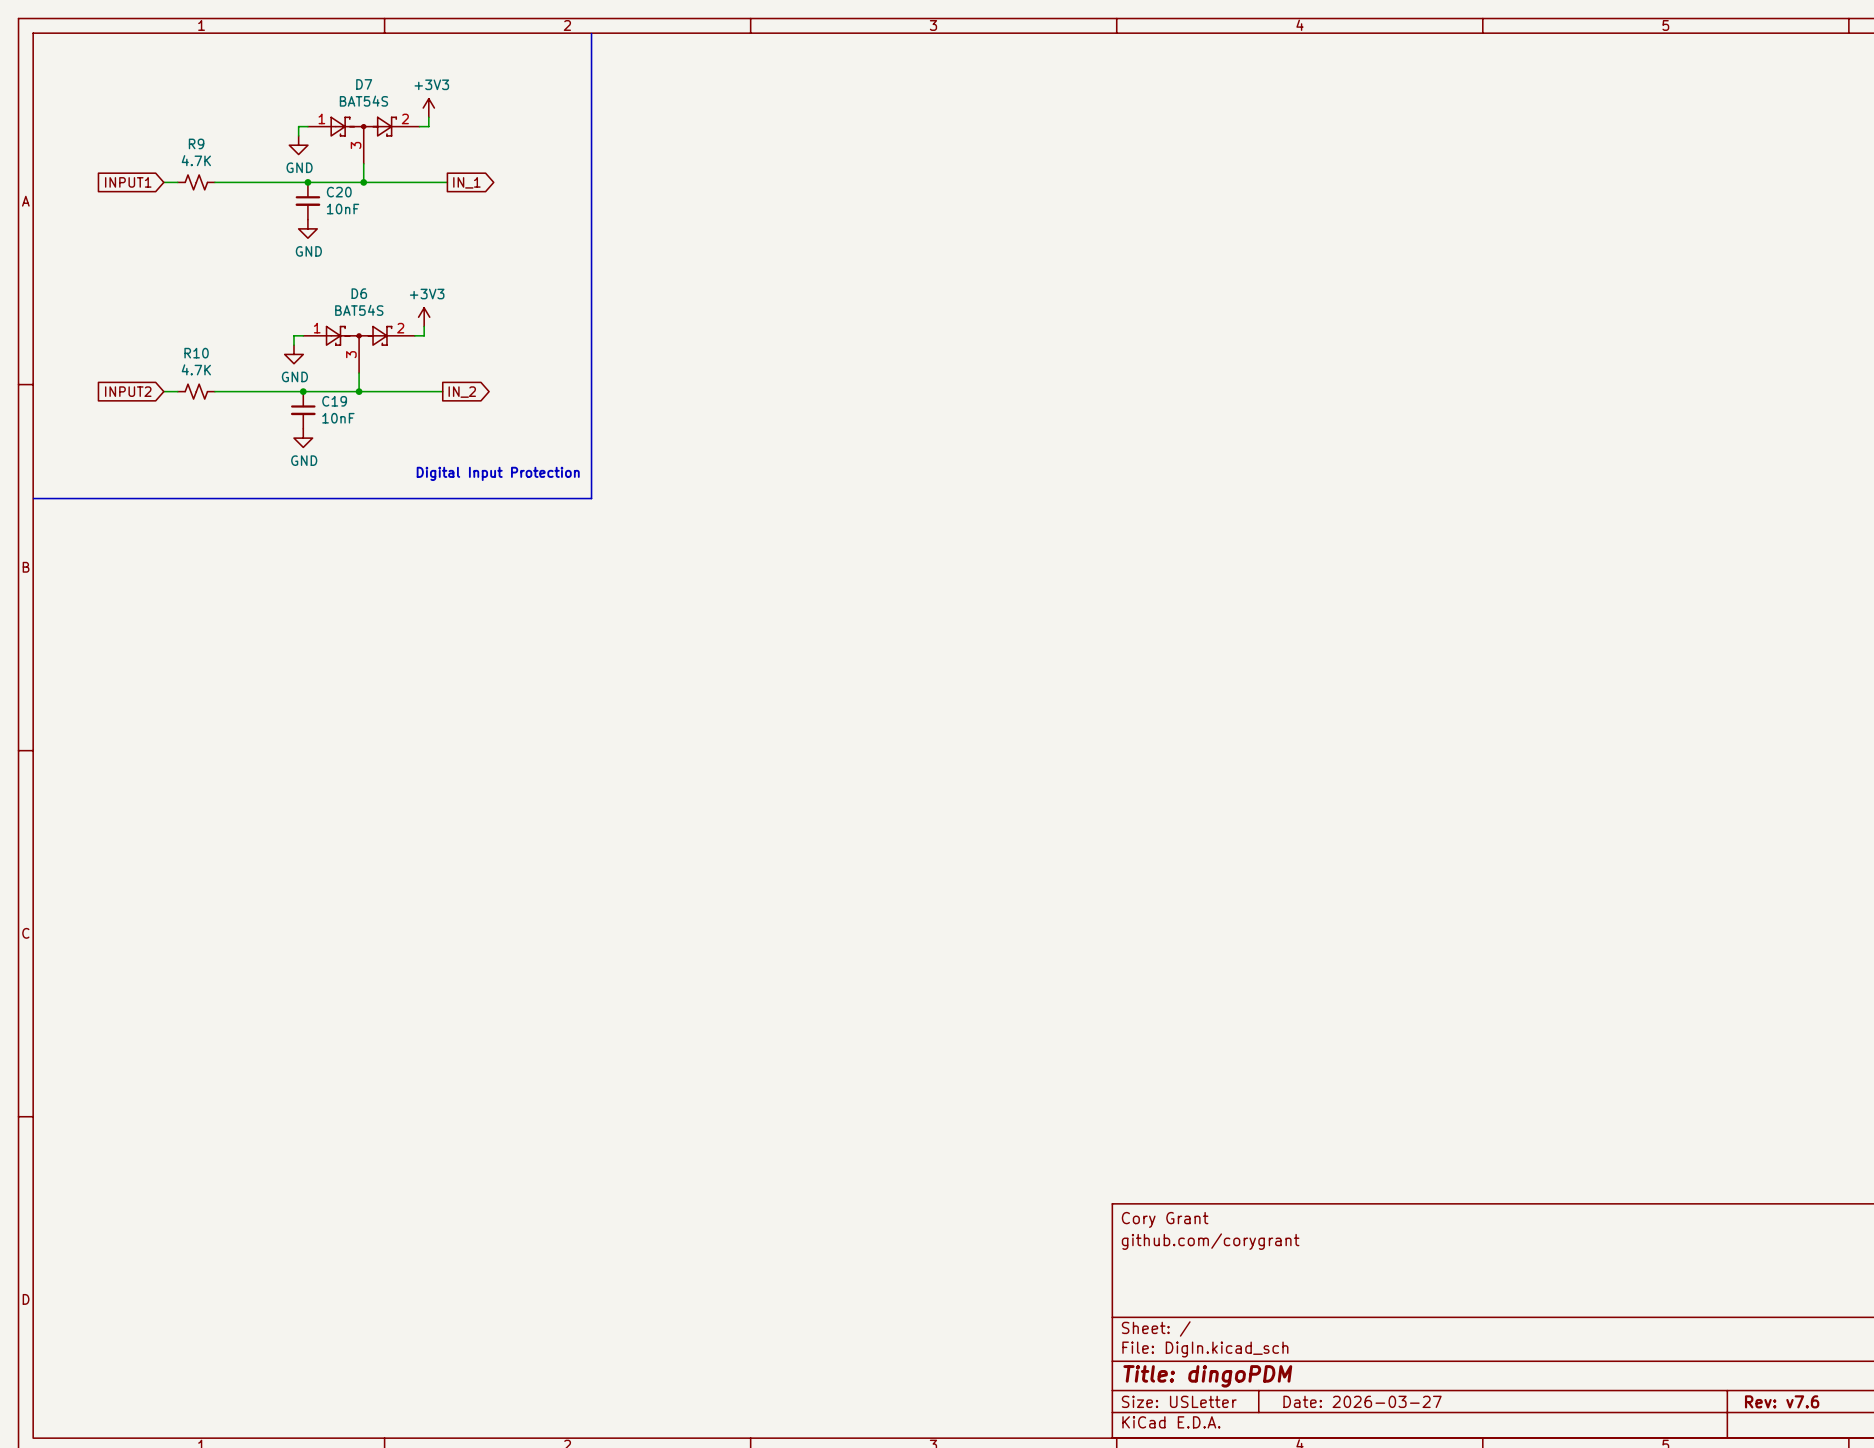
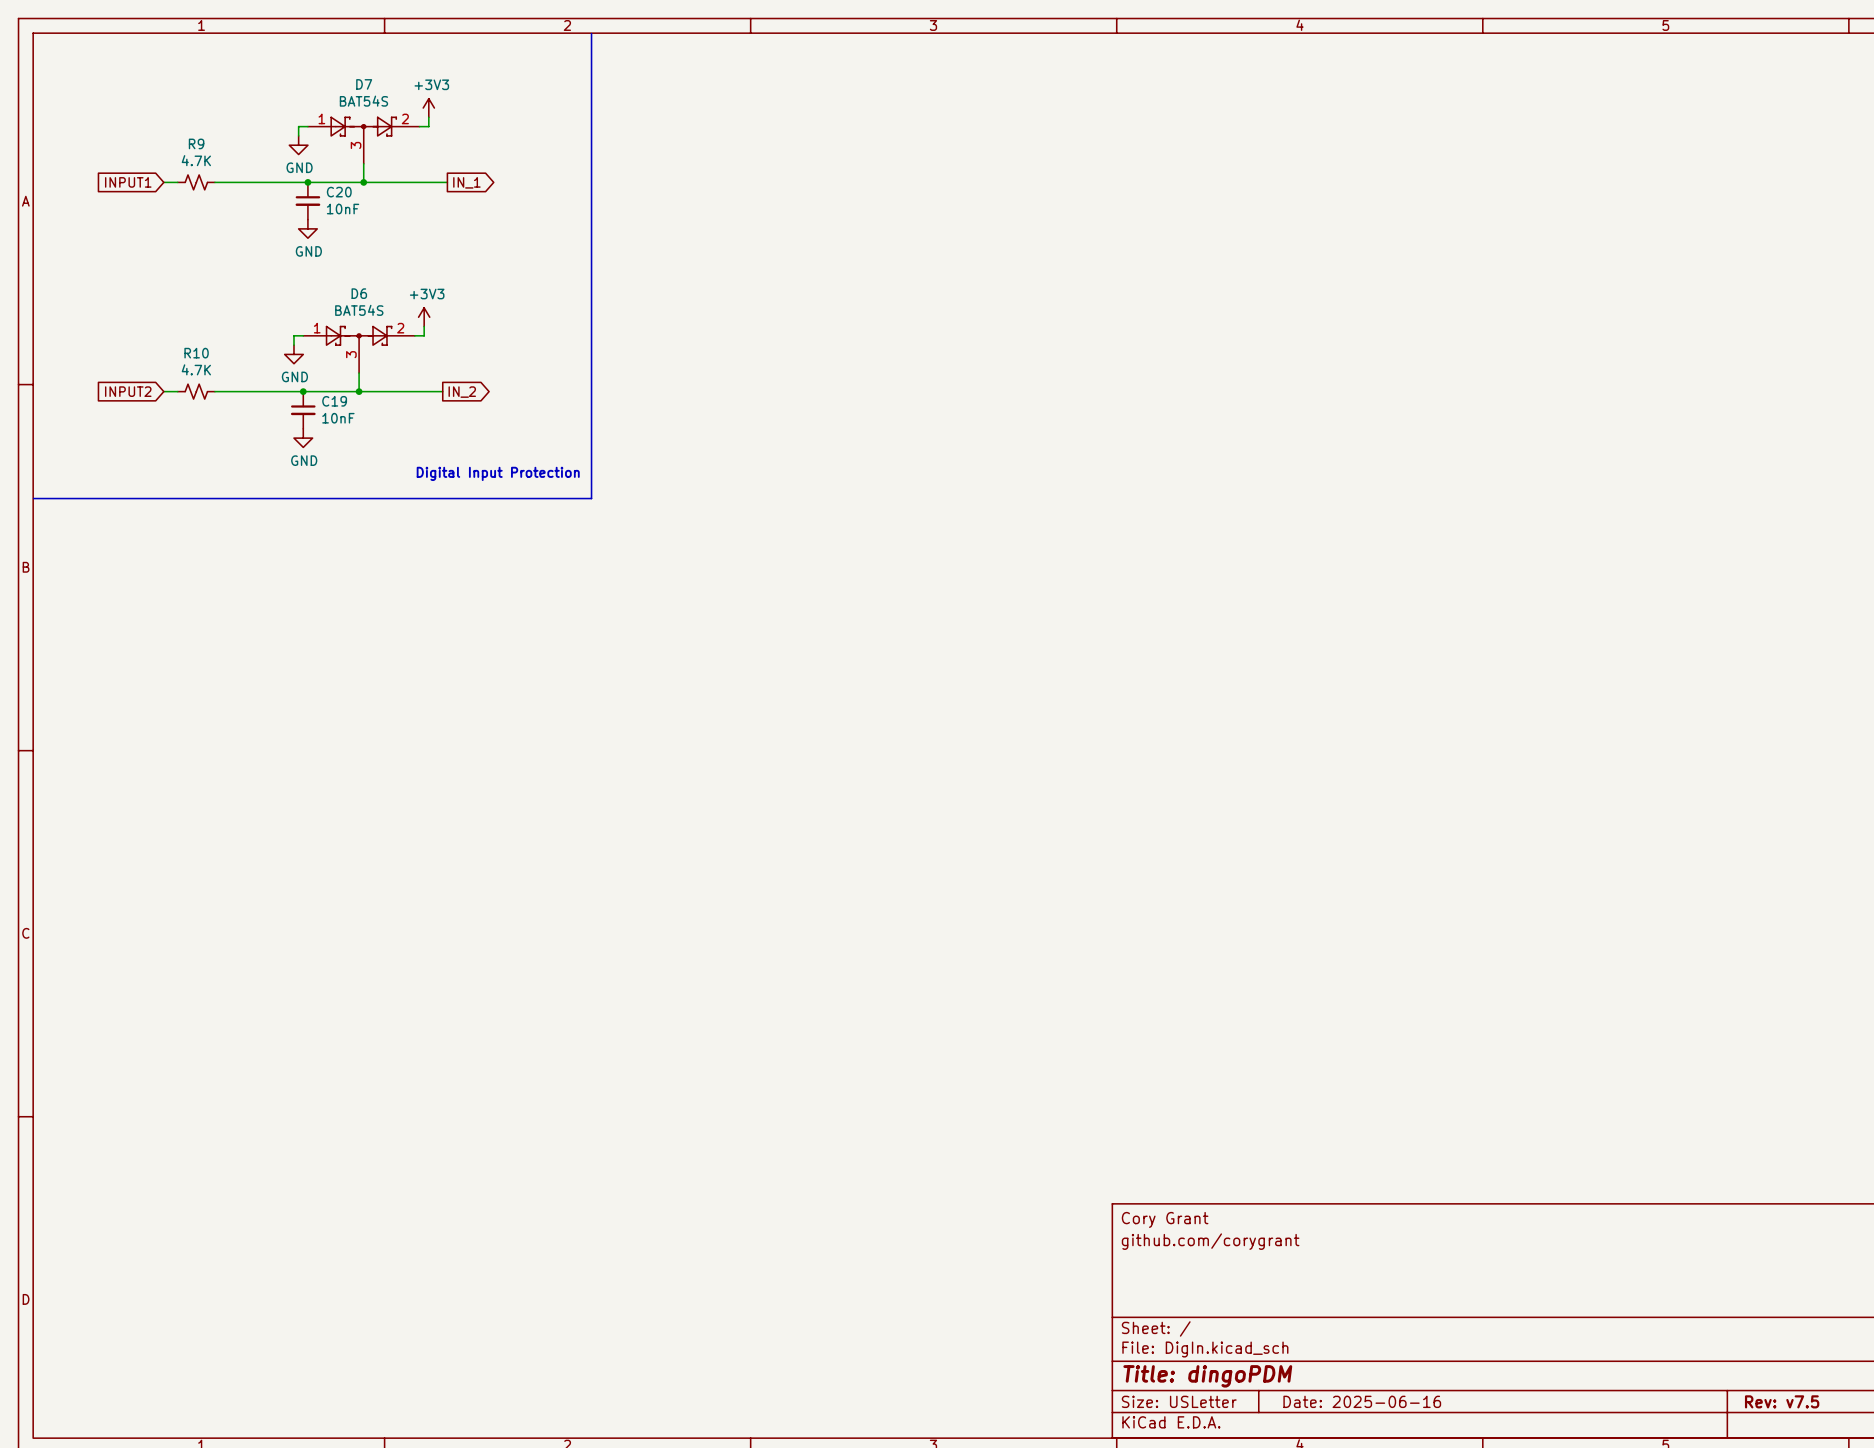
title block: Date: 2026-03-27 (1362, 1401) -> Date: 2025-06-16 (1362, 1401)
title block: Rev: v7.6 (1782, 1401) -> Rev: v7.5 (1782, 1401)

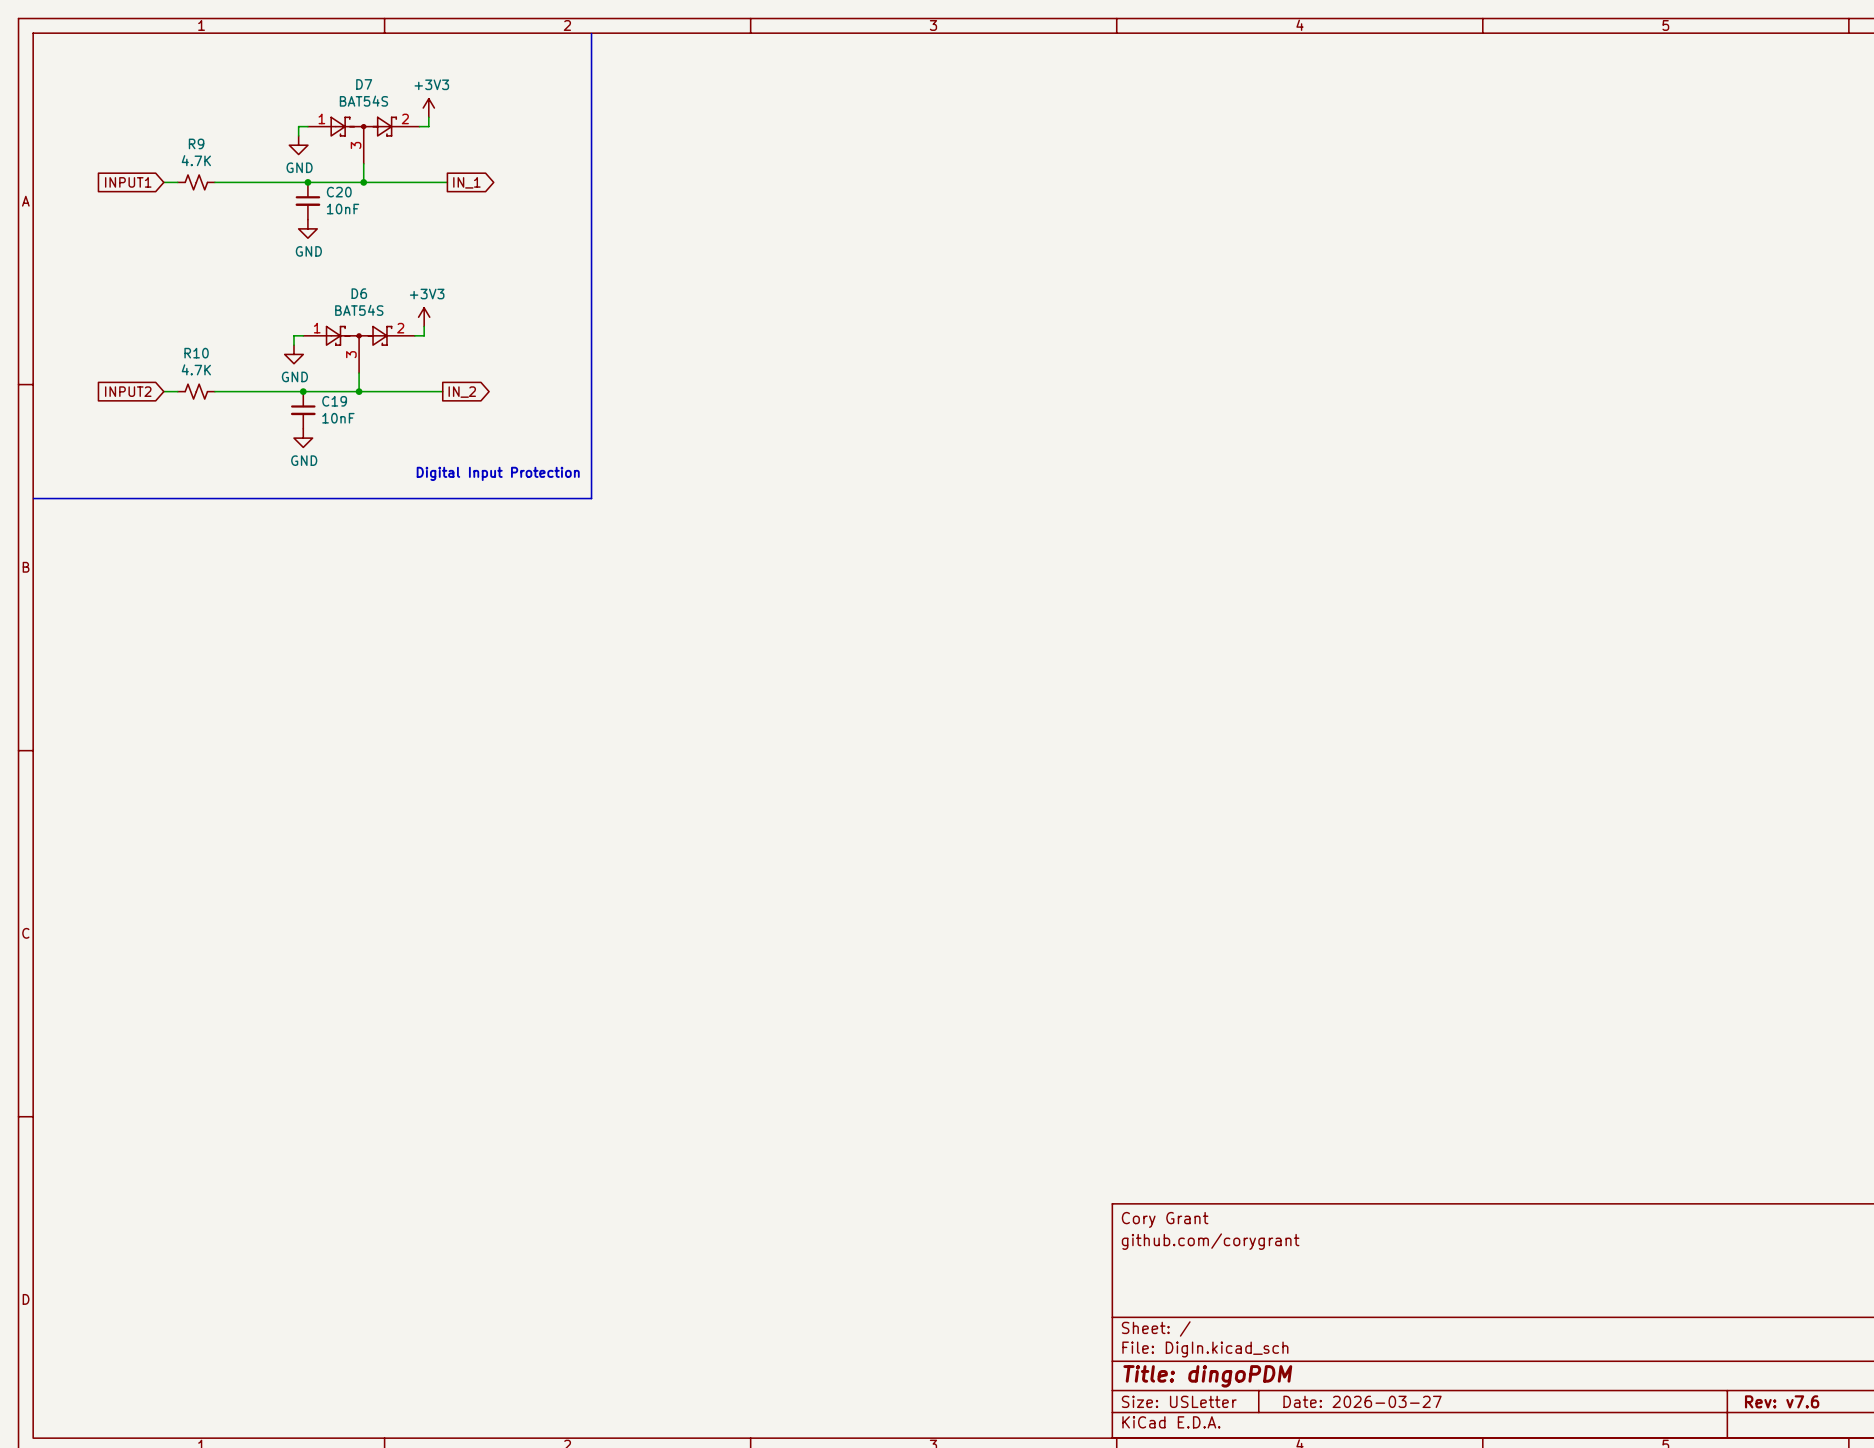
title block: Date: 2025-06-16 (1362, 1401) -> Date: 2026-03-27 (1362, 1401)
title block: Rev: v7.5 (1782, 1401) -> Rev: v7.6 (1782, 1401)

